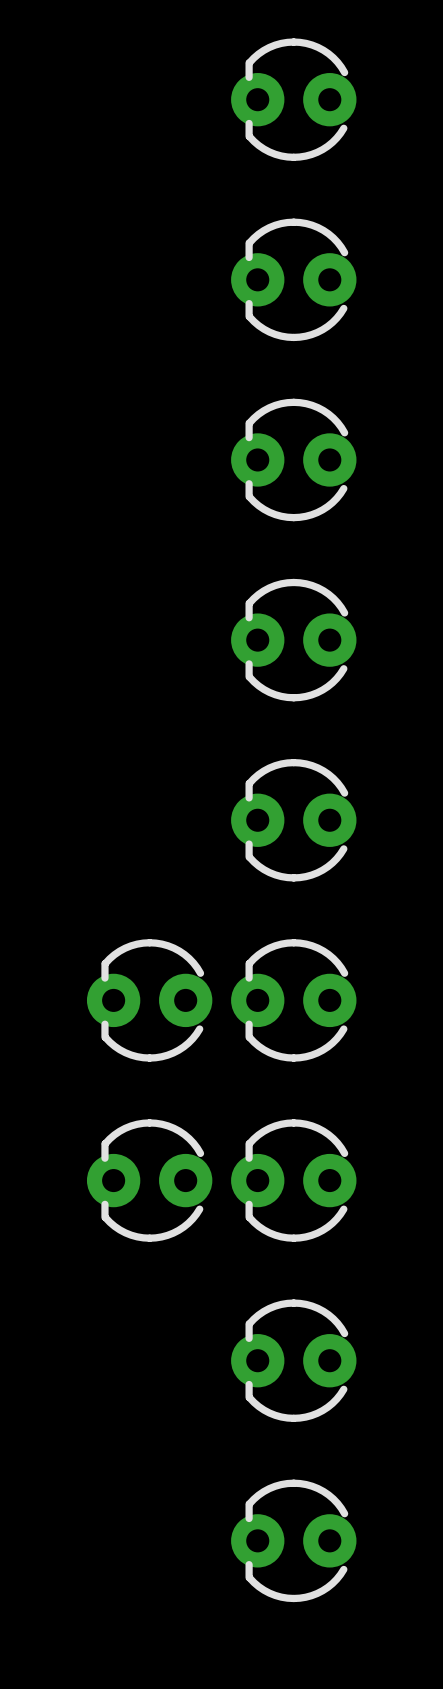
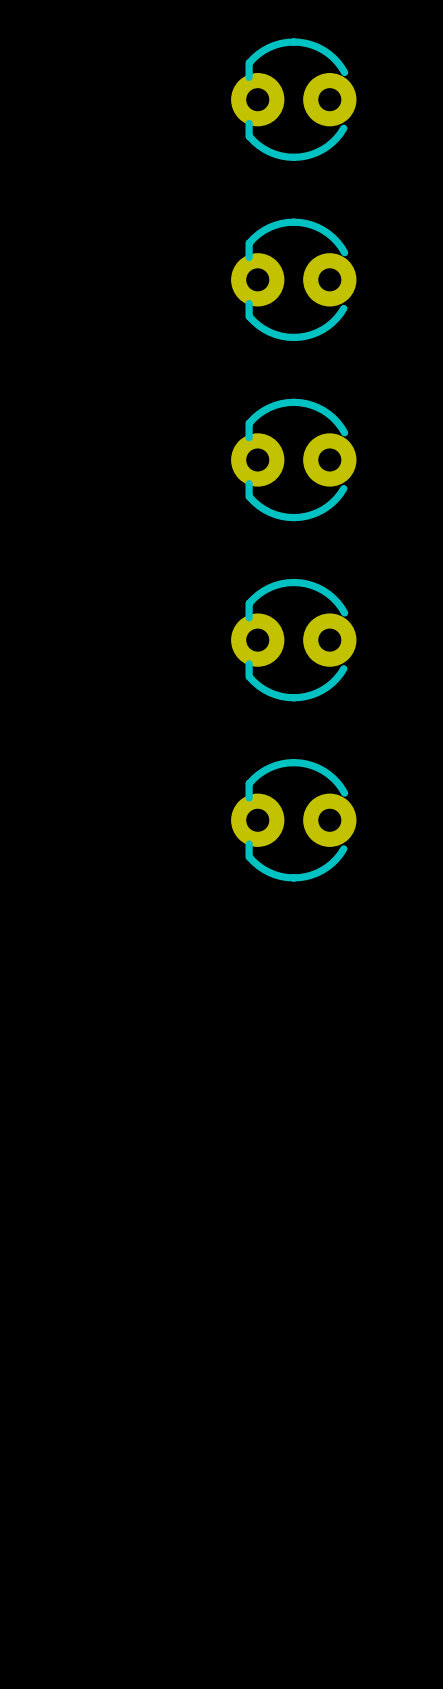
part: (149, 1000) -> none
part: (293, 1000) -> none
part: (149, 1180) -> none
part: (293, 1180) -> none
part: (293, 1360) -> none
part: (293, 1540) -> none

